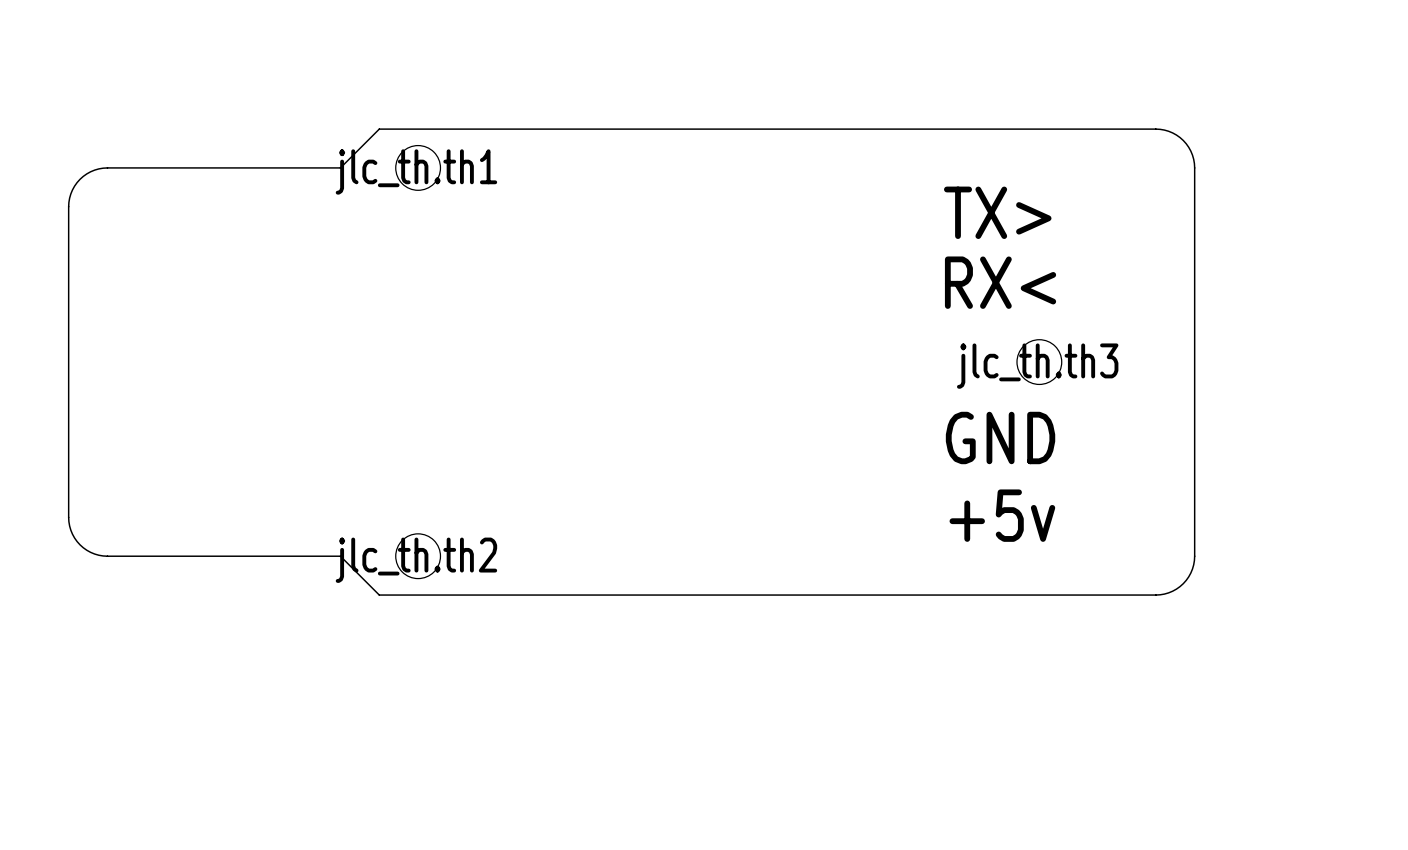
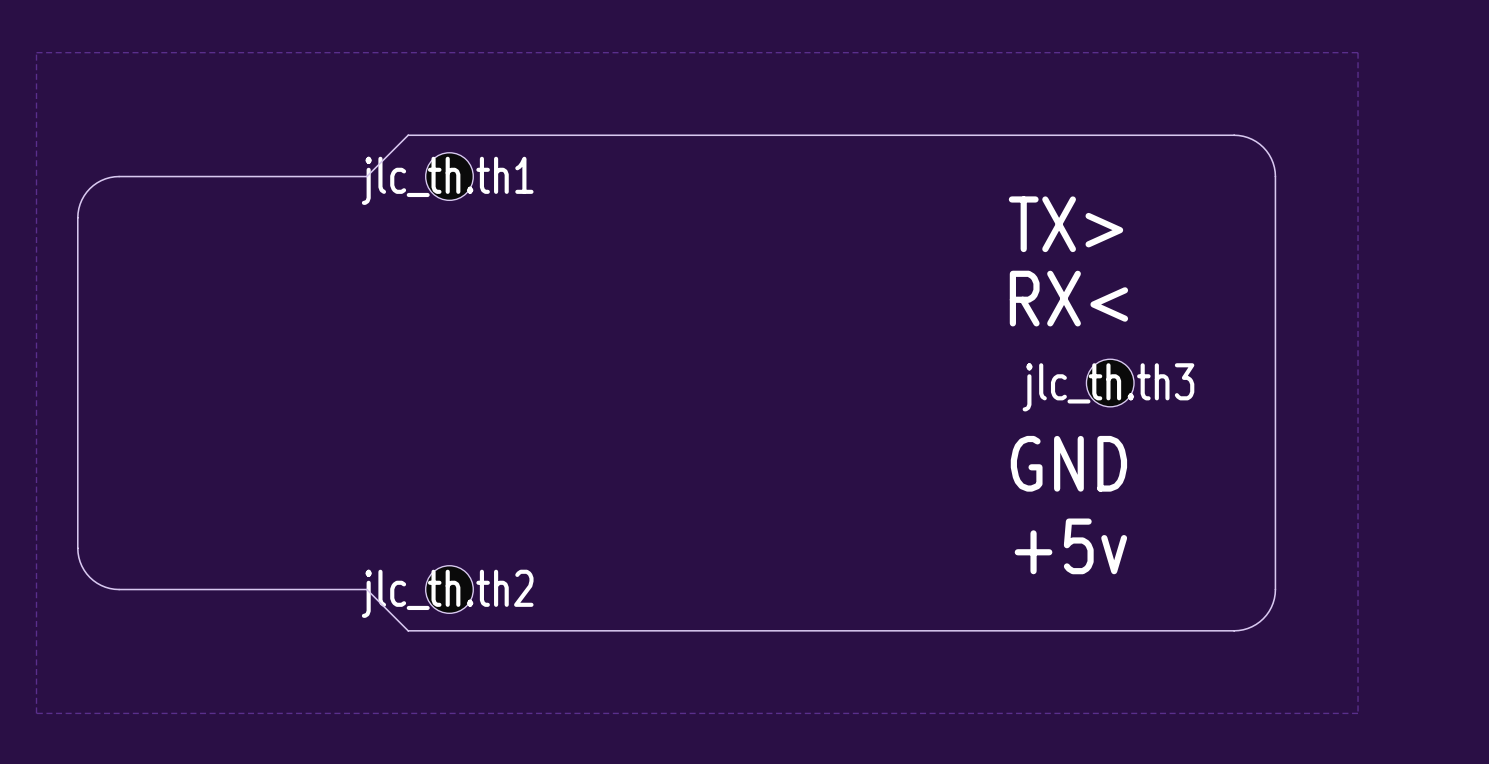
zone outline: none -> (36, 52) (36, 713) (1358, 713) (1358, 52) (36, 52)

